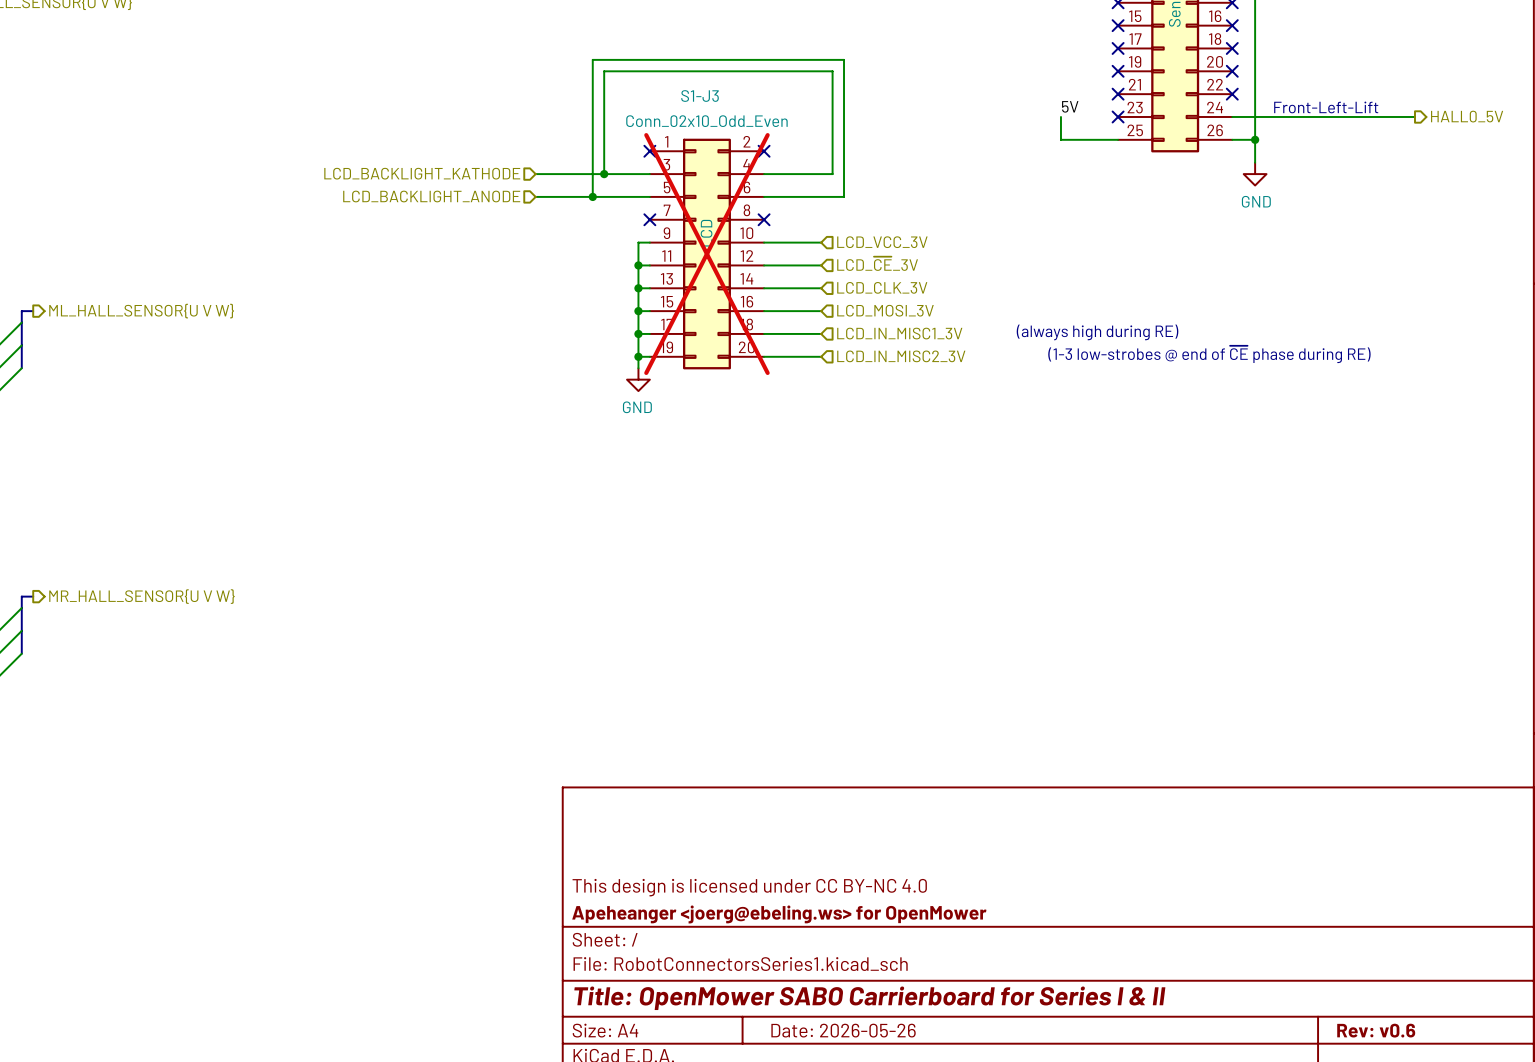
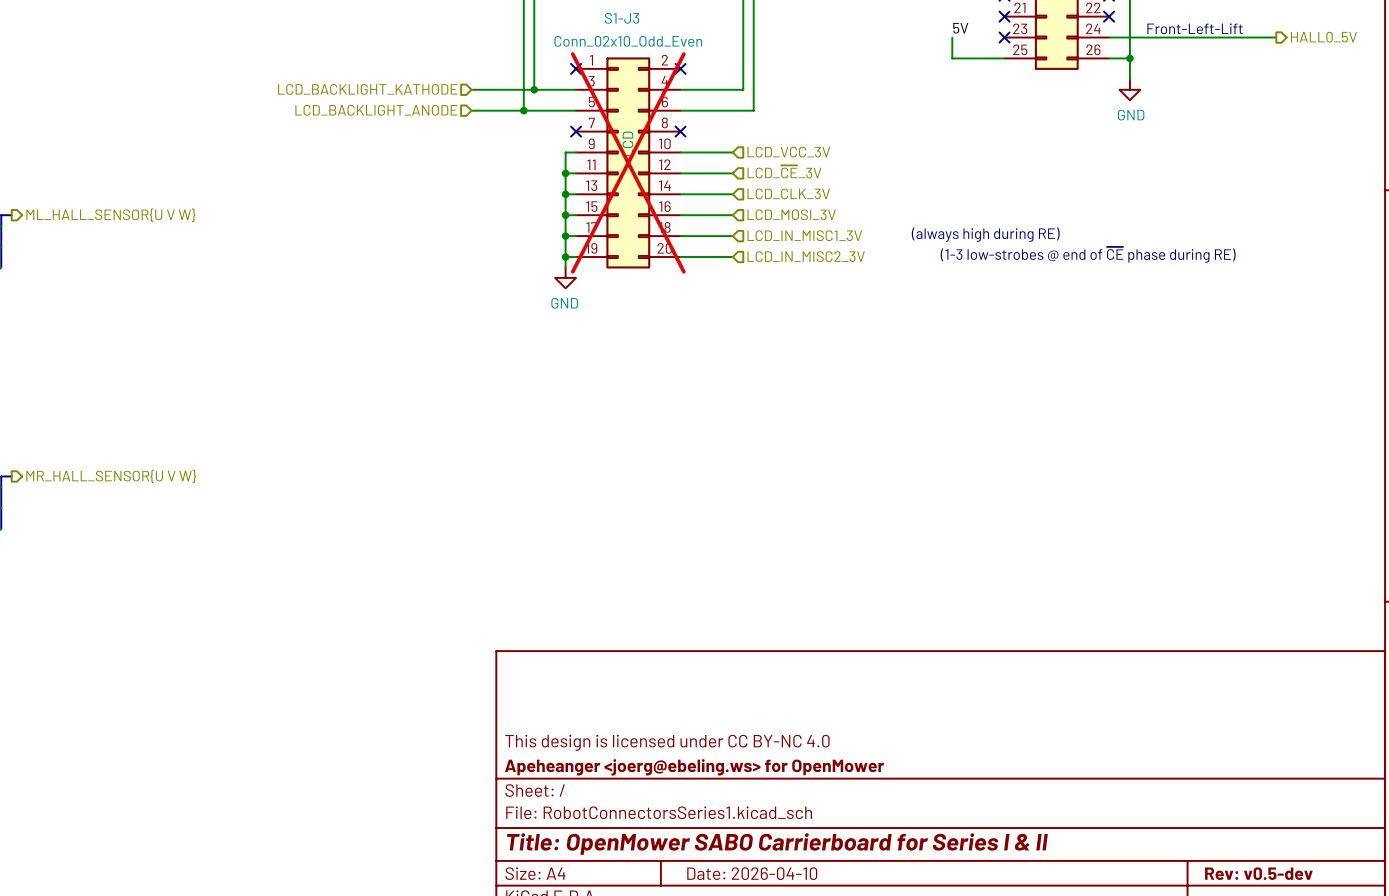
title block: Date: 2026-05-26 (843, 1030) -> Date: 2026-04-10 (752, 873)
title block: Rev: v0.6 (1376, 1030) -> Rev: v0.5-dev (1258, 873)

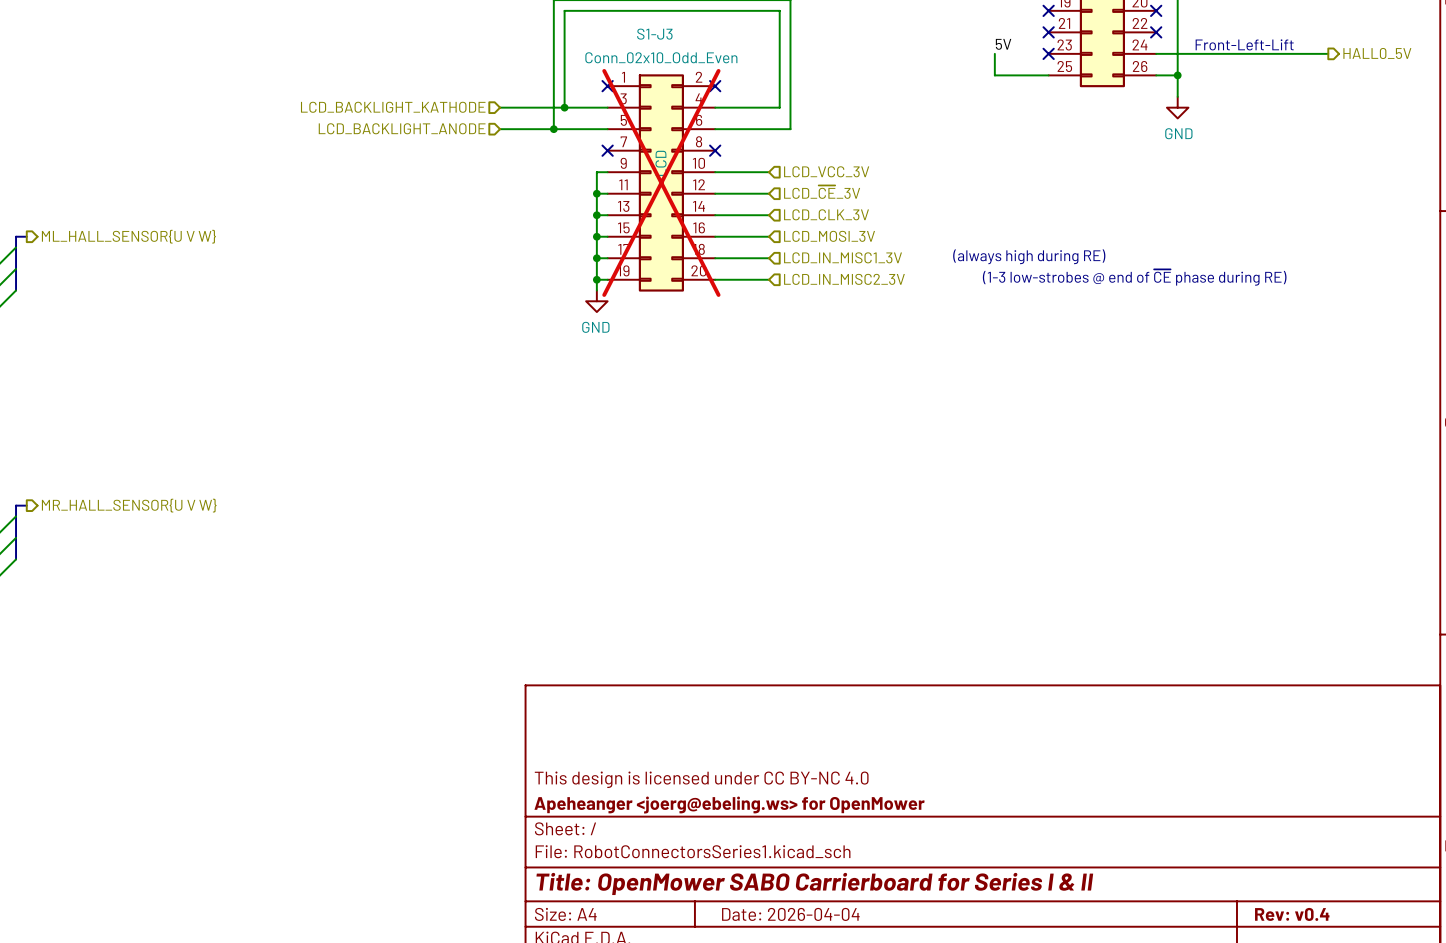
title block: Date: 2026-04-10 (752, 873) -> Date: 2026-04-04 (790, 914)
title block: Rev: v0.5-dev (1258, 873) -> Rev: v0.4 (1292, 914)

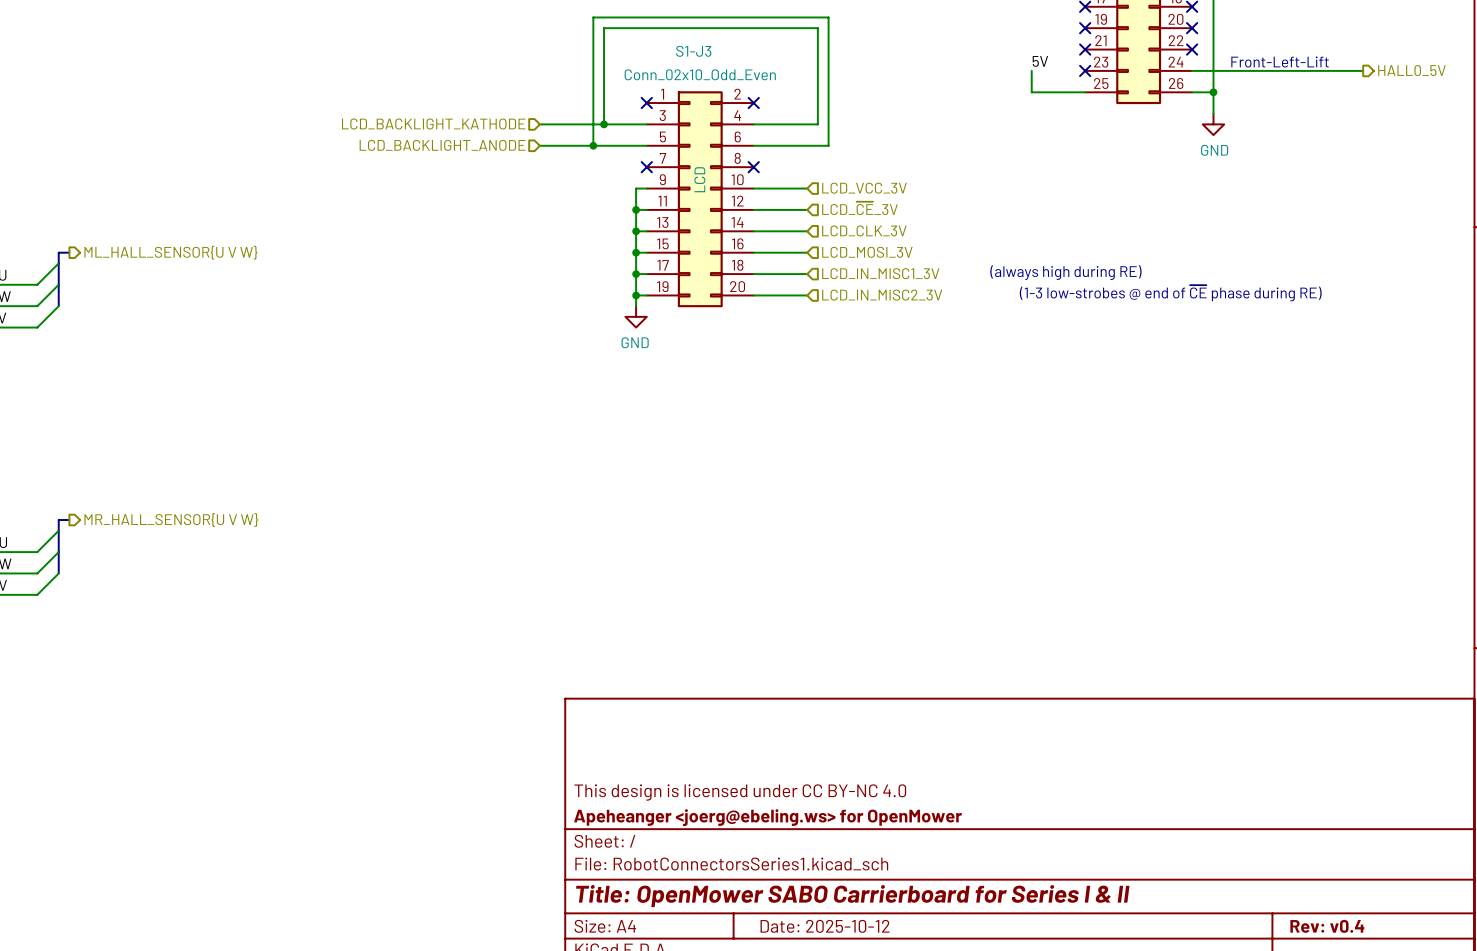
S1-J3 do-not-place cross: (661, 182) -> none
title block: Date: 2026-04-04 (790, 914) -> Date: 2025-10-12 (825, 926)

